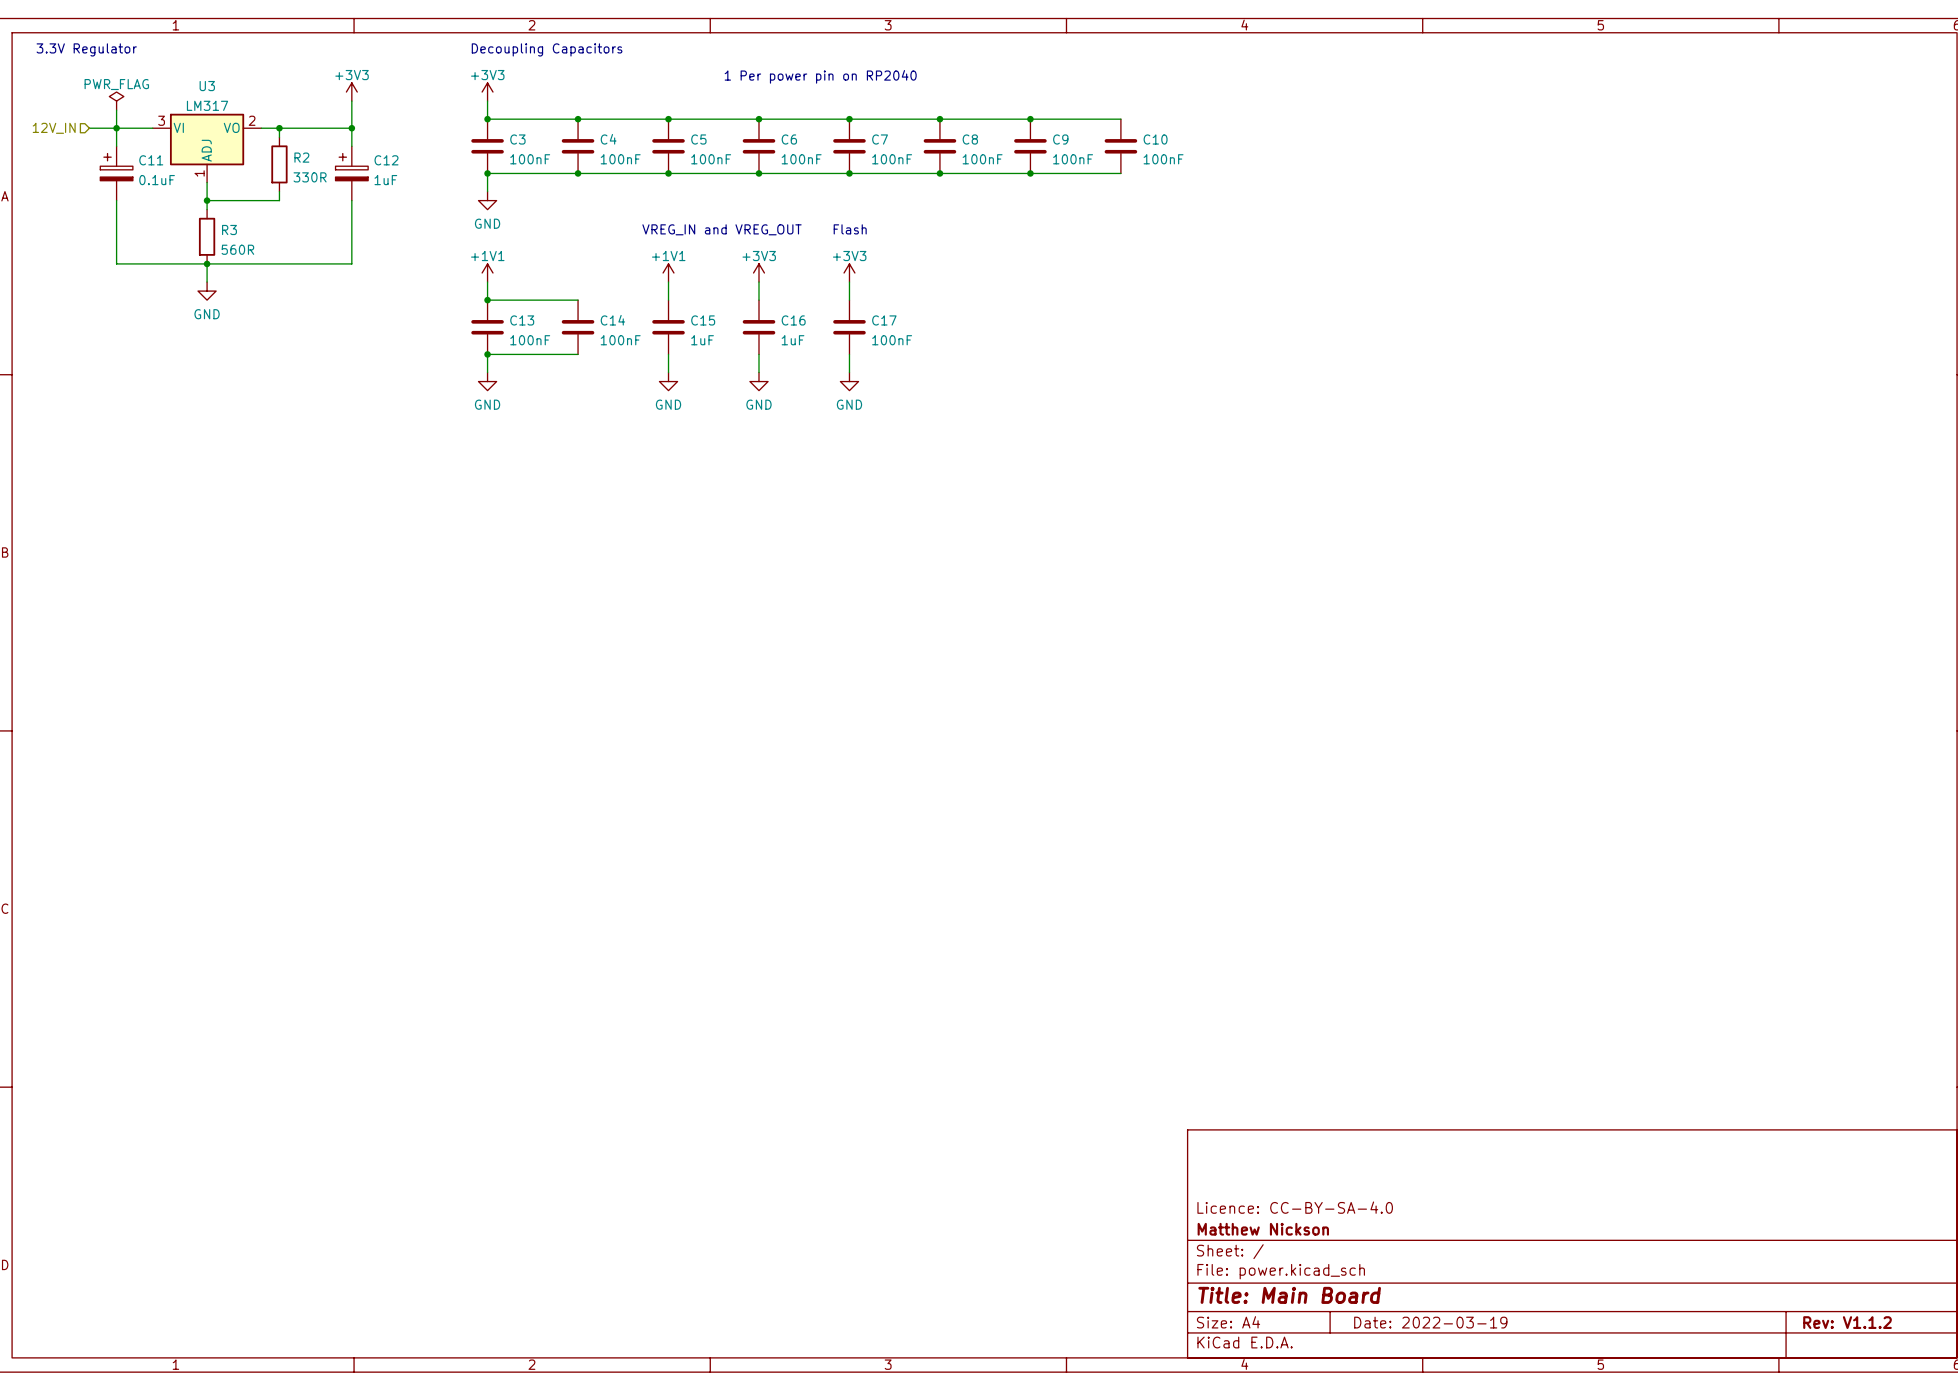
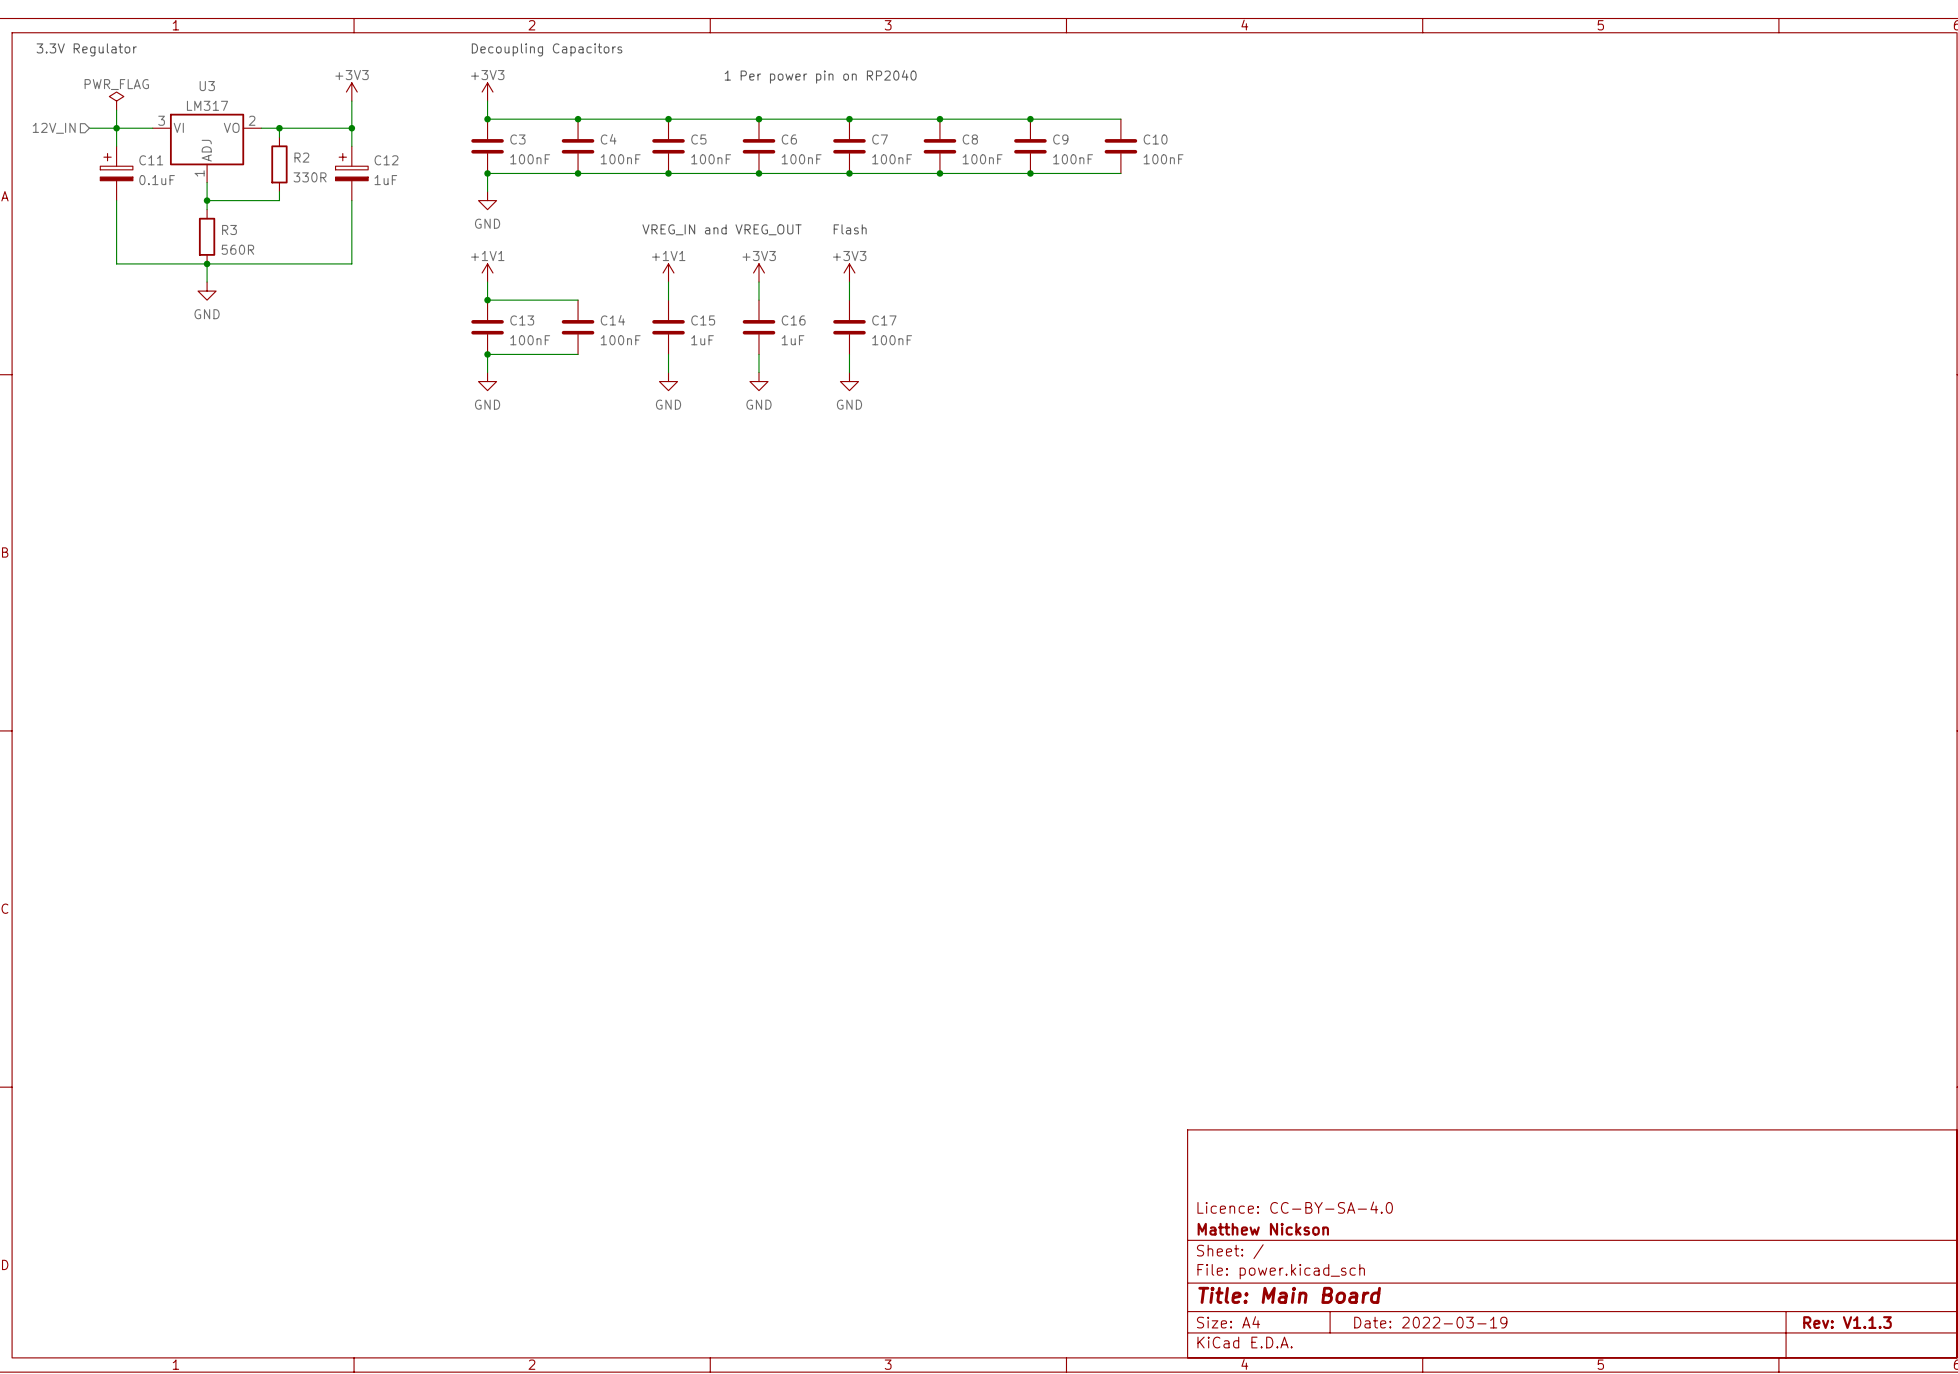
title block: Rev: V1.1.2 (1847, 1322) -> Rev: V1.1.3 (1847, 1322)

